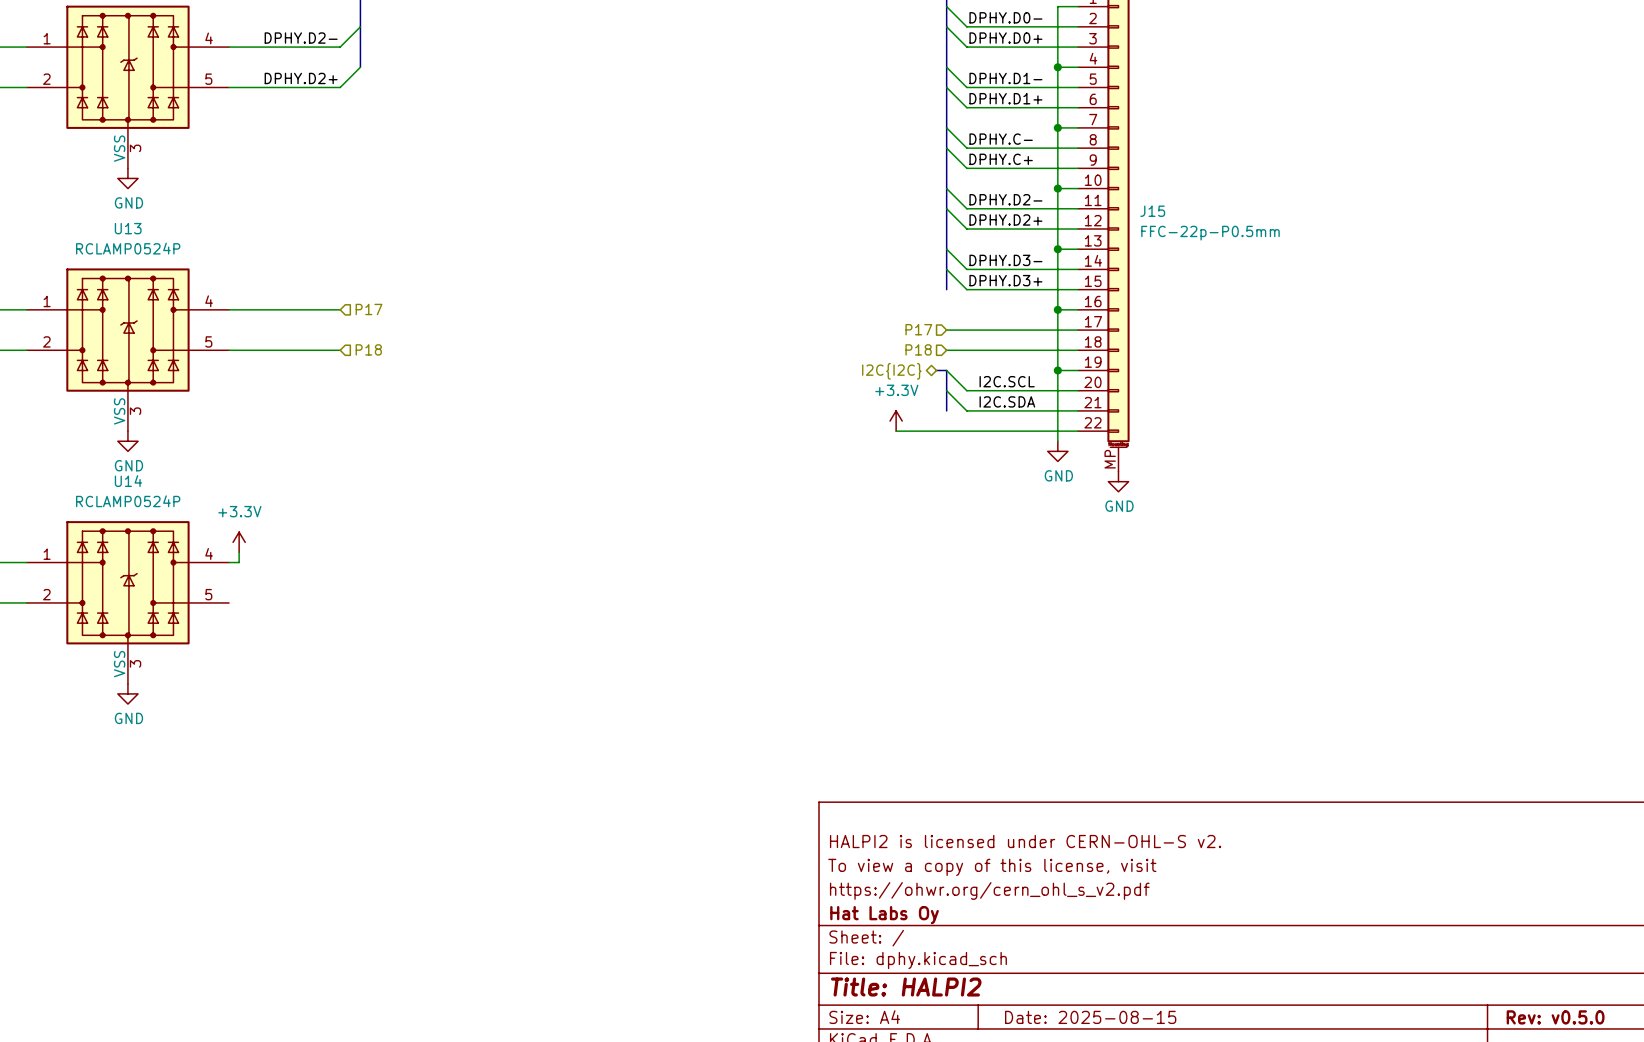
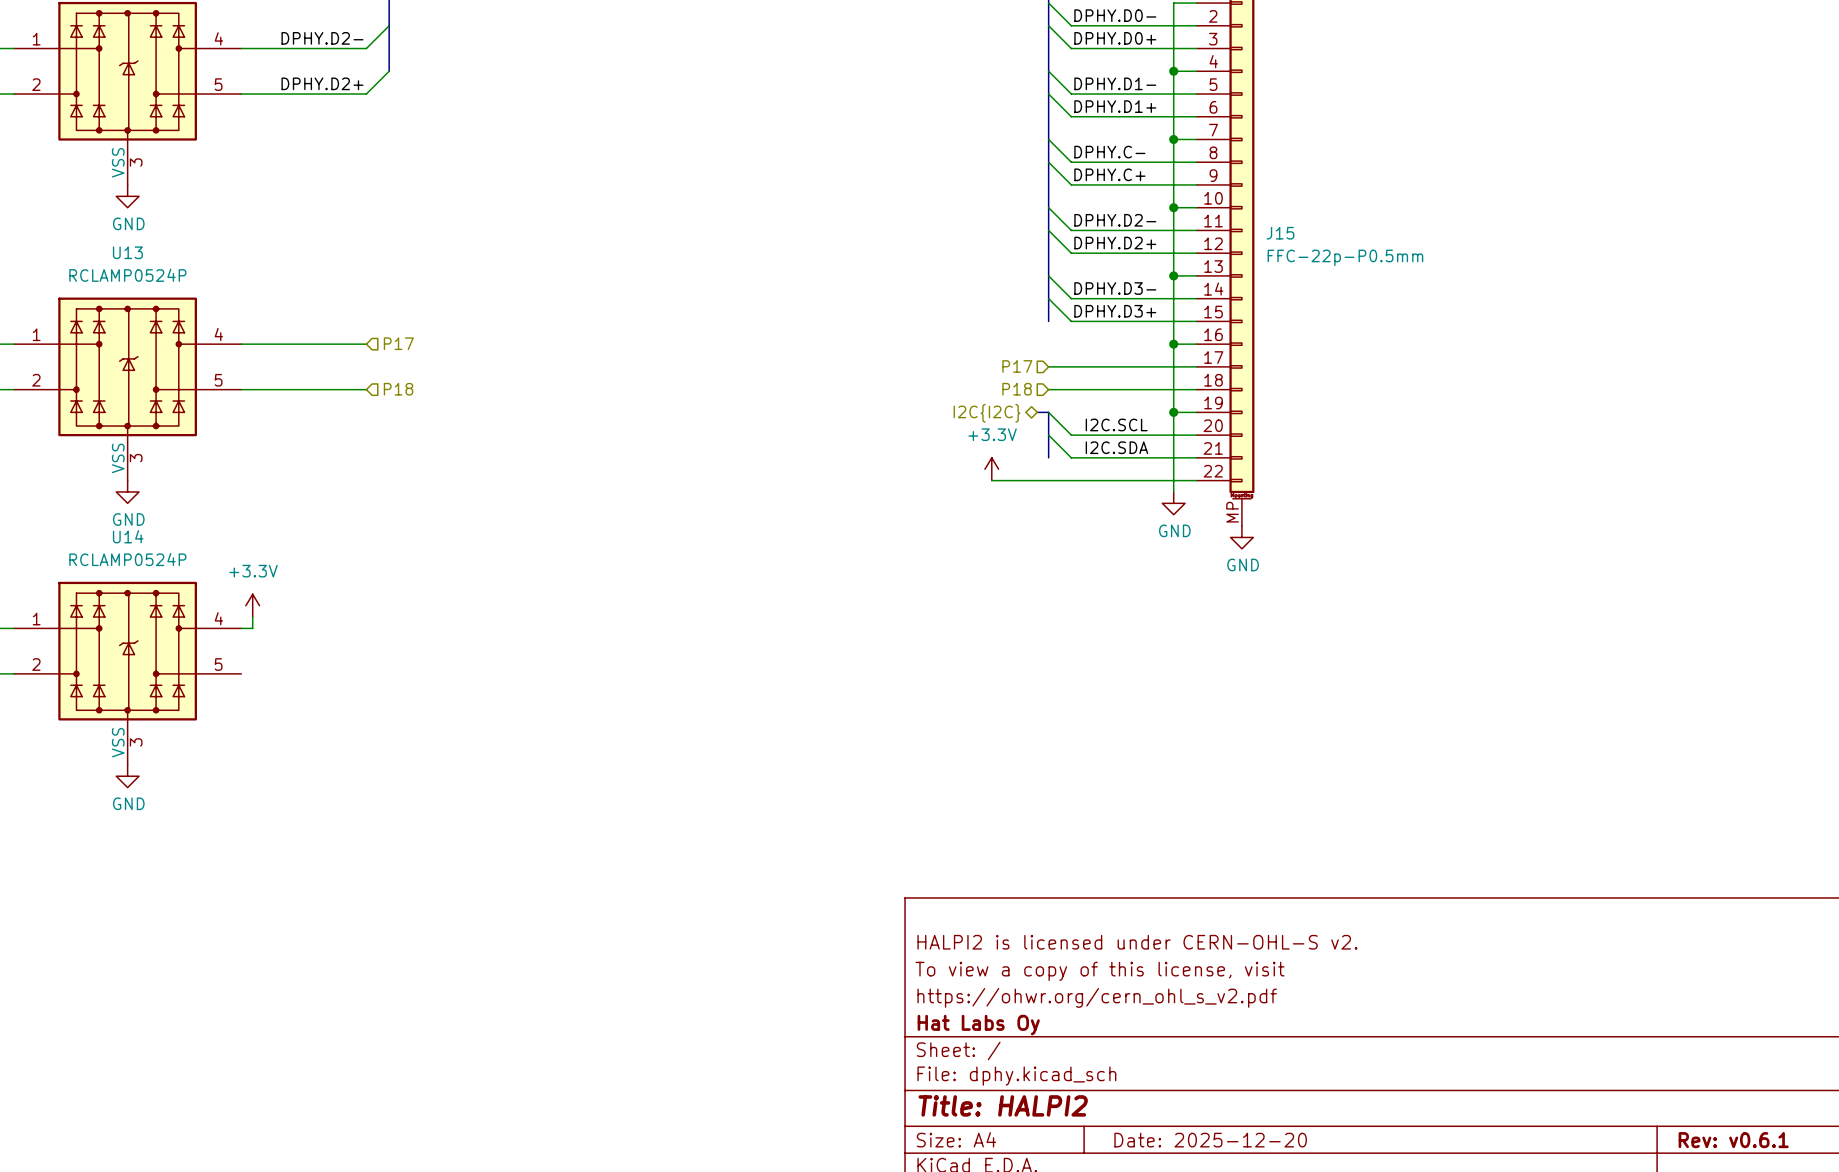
title block: Date: 2025-08-15 (1090, 1017) -> Date: 2025-12-20 (1210, 1140)
title block: Rev: v0.5.0 (1555, 1017) -> Rev: v0.6.1 (1733, 1140)

